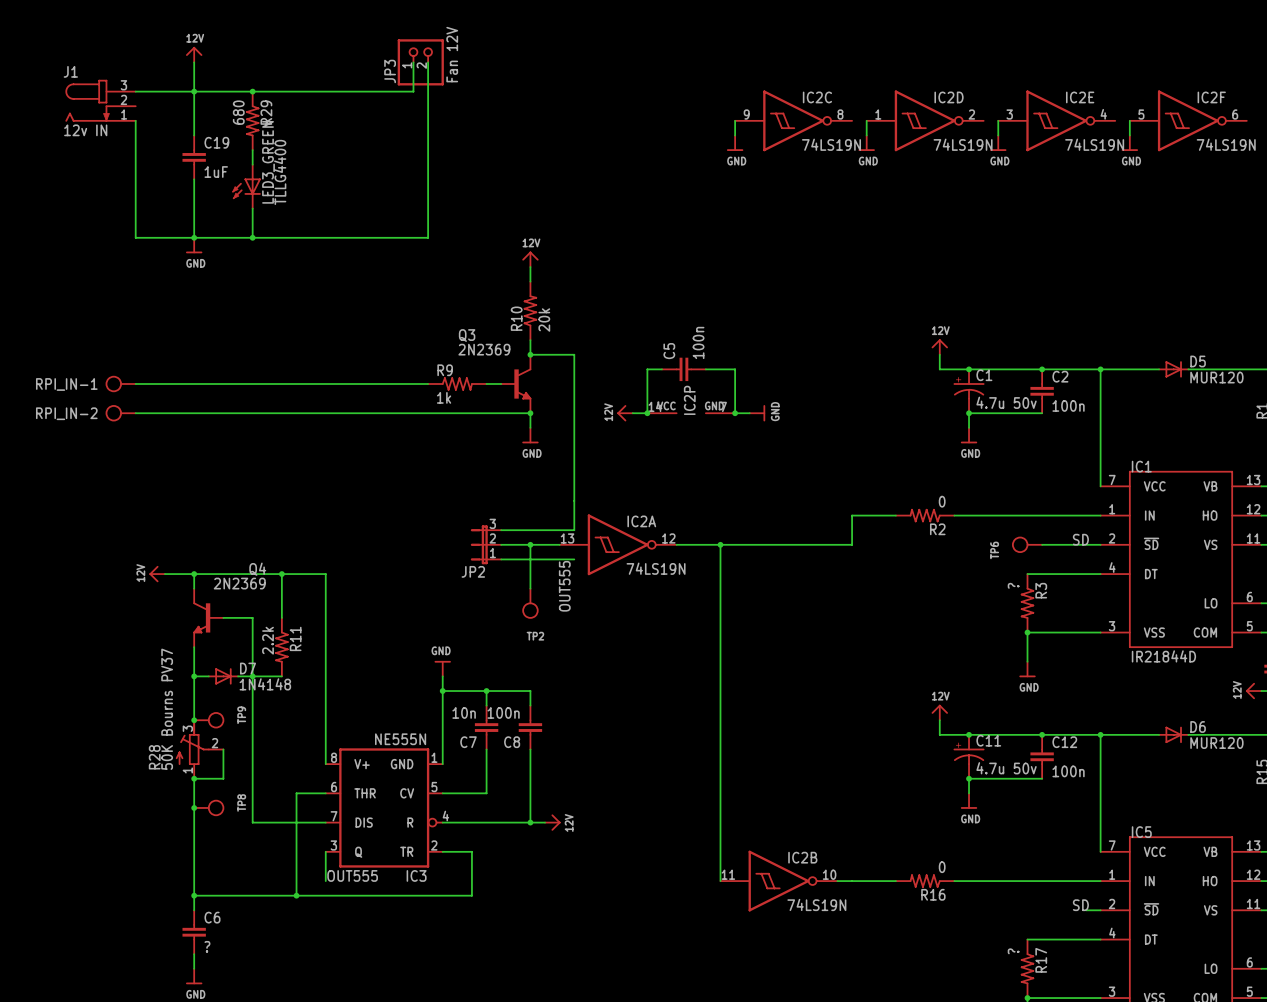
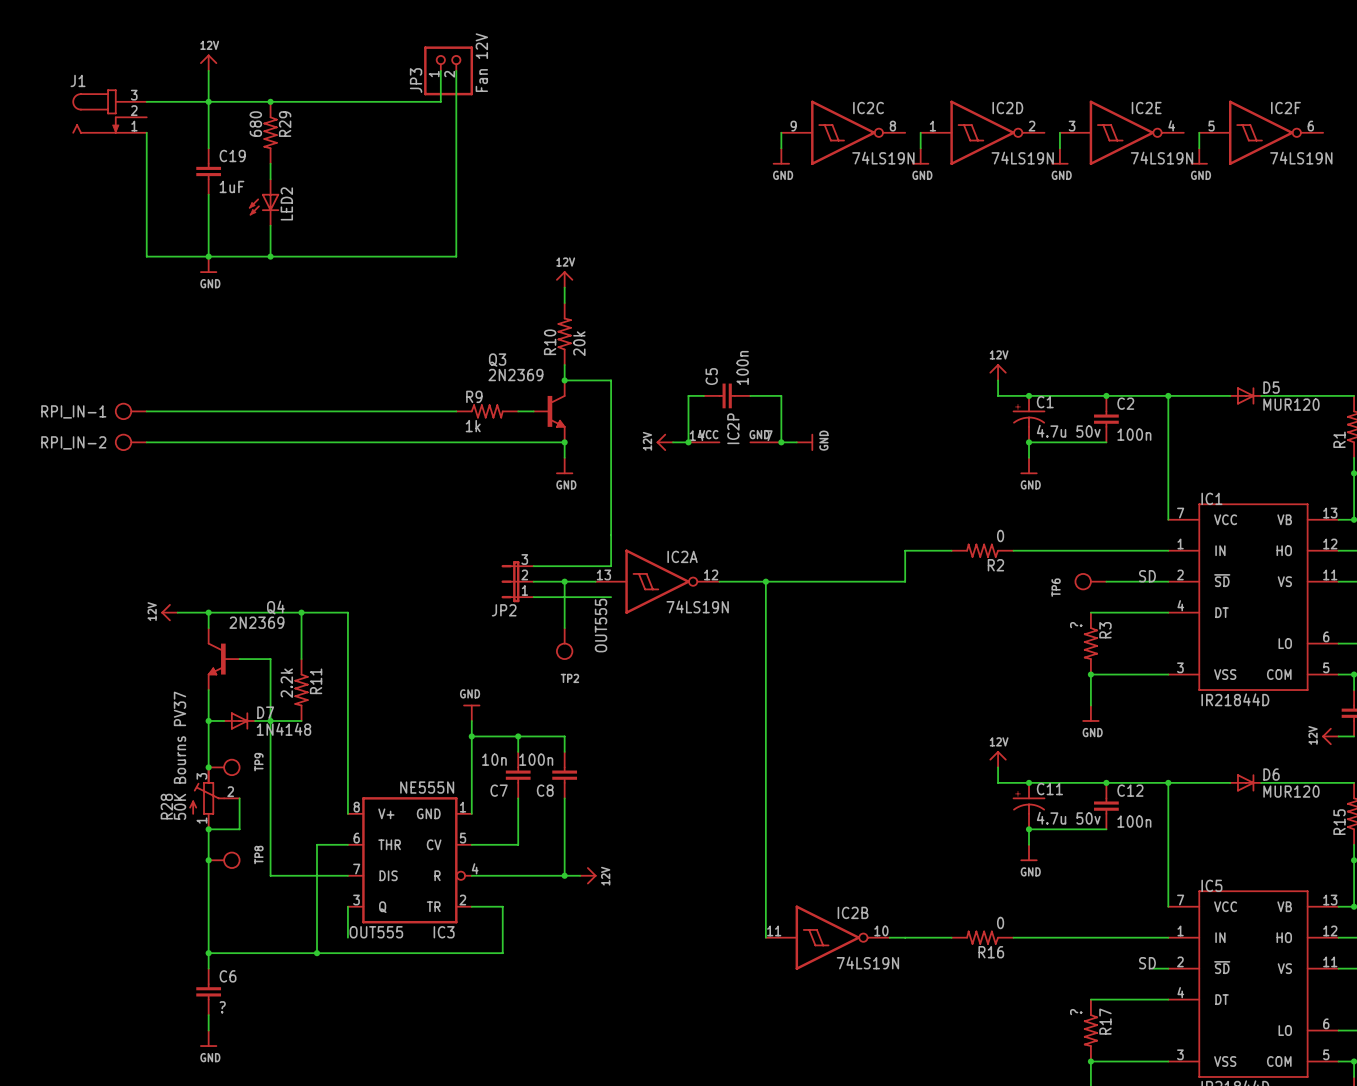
J1 value: 12v IN (85, 130) -> none
LED3_GREEN name: LED3_GREEN (268, 162) -> LED2 (286, 203)
LED3_GREEN value: TLLG4400 (280, 172) -> none

